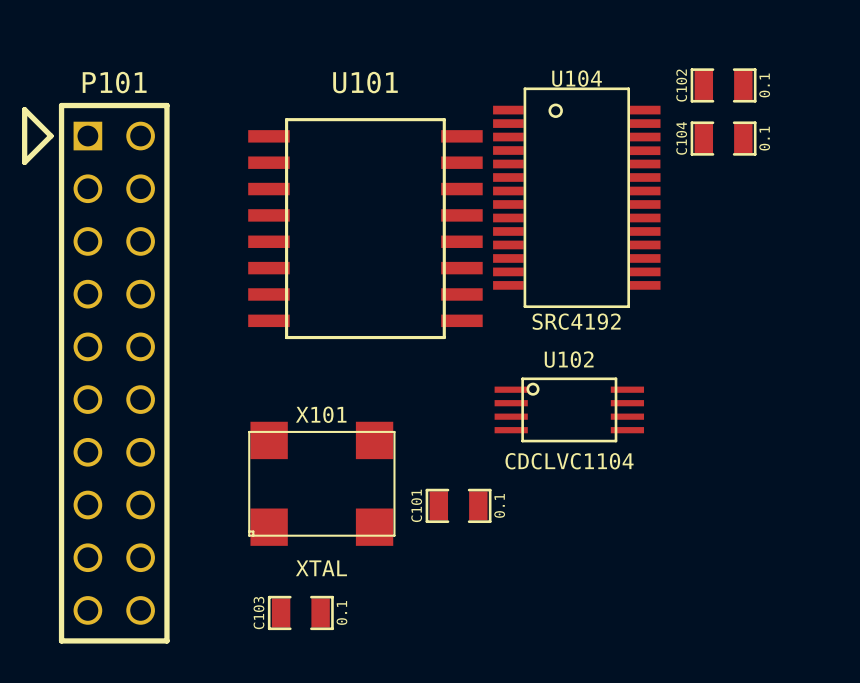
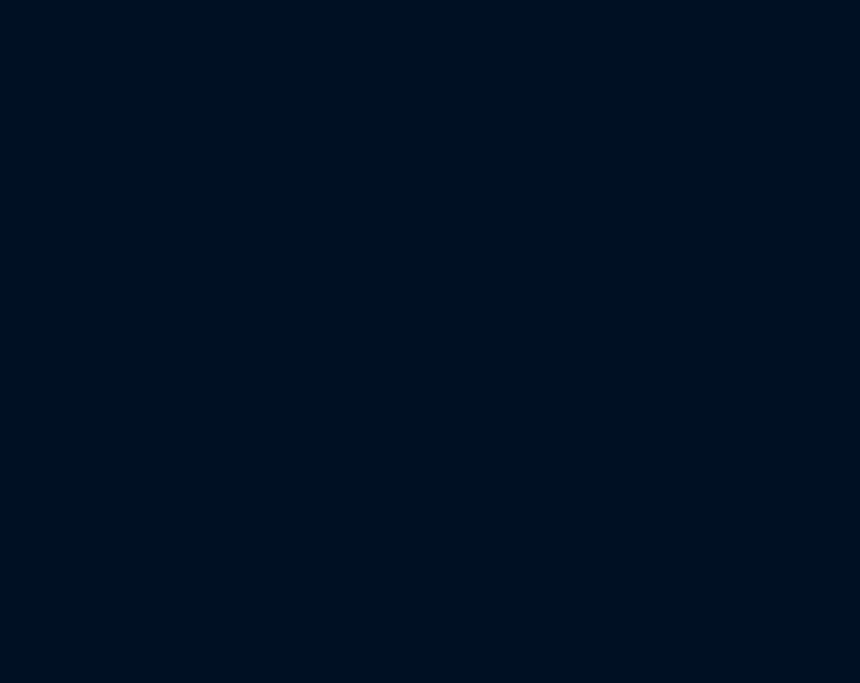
C102: 0.1 (723, 85) -> none
C104: 0.1 (723, 138) -> none
U104: SRC4192 (576, 197) -> none
U101: (365, 228) -> none
P101: (95, 373) -> none
U102: CDCLVC1104 (569, 409) -> none
X101: XTAL (321, 483) -> none
C101: 0.1 (458, 505) -> none
C103: 0.1 (300, 612) -> none

